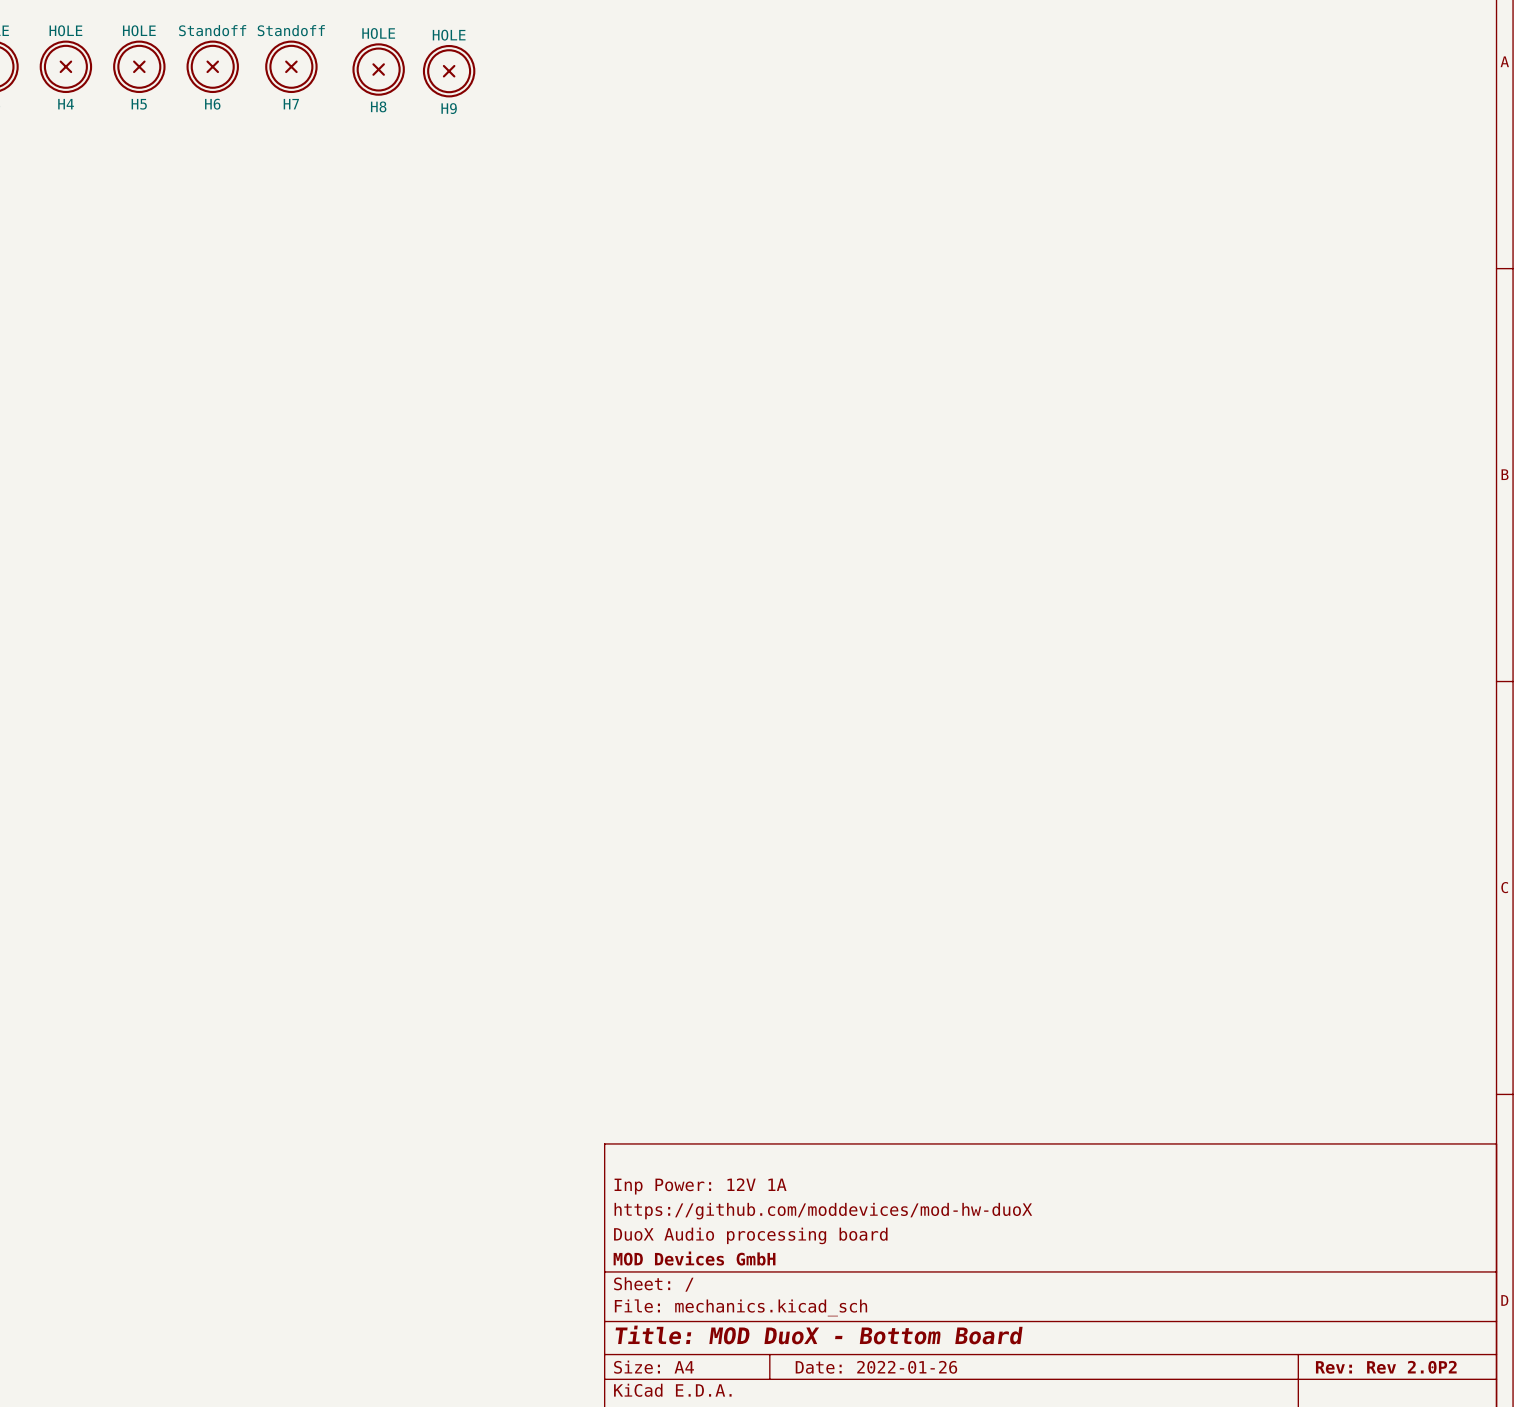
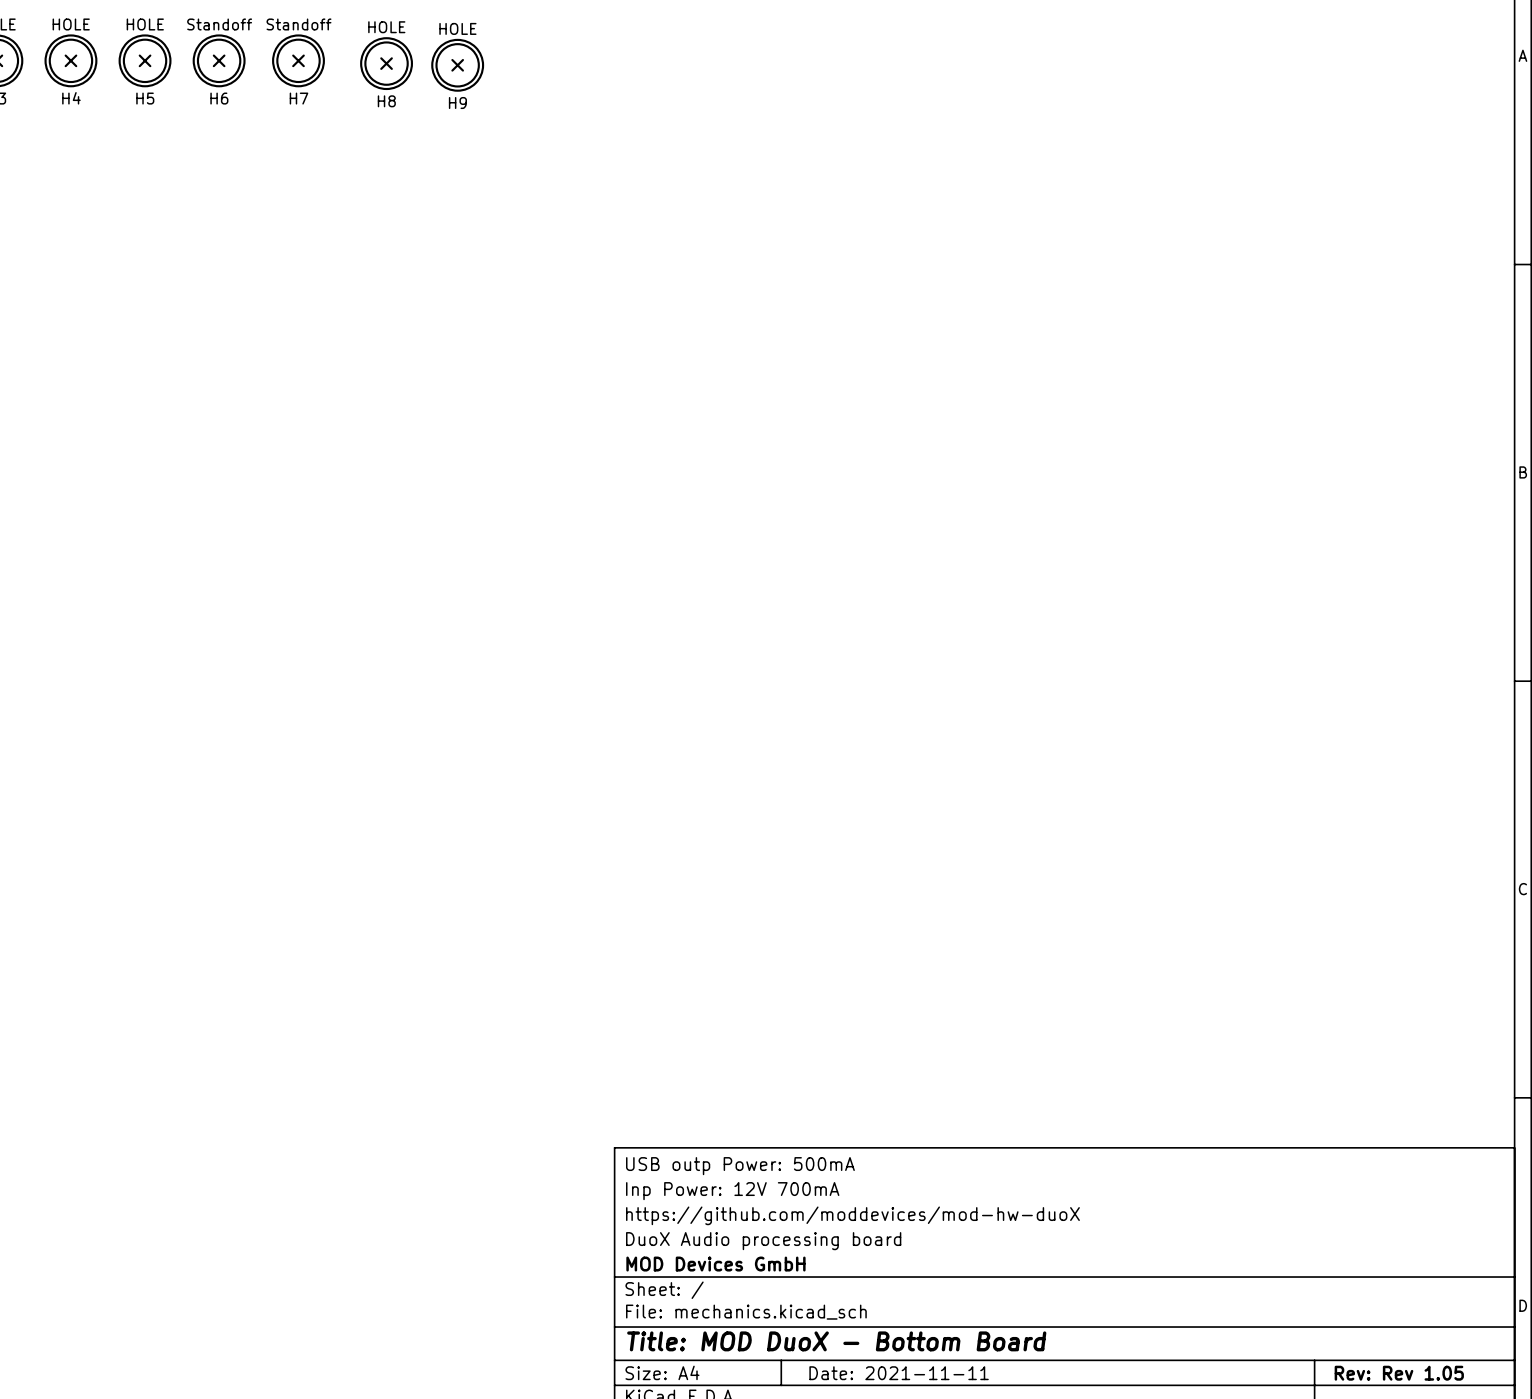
title block: none -> USB outp Power: 500mA (740, 1166)
title block: Inp Power: 12V 1A (700, 1186) -> Inp Power: 12V 700mA (732, 1191)
title block: Date: 2022-01-26 (876, 1367) -> Date: 2021-11-11 (899, 1373)
title block: Rev: Rev 2.0P2 (1386, 1367) -> Rev: Rev 1.05 (1399, 1373)

